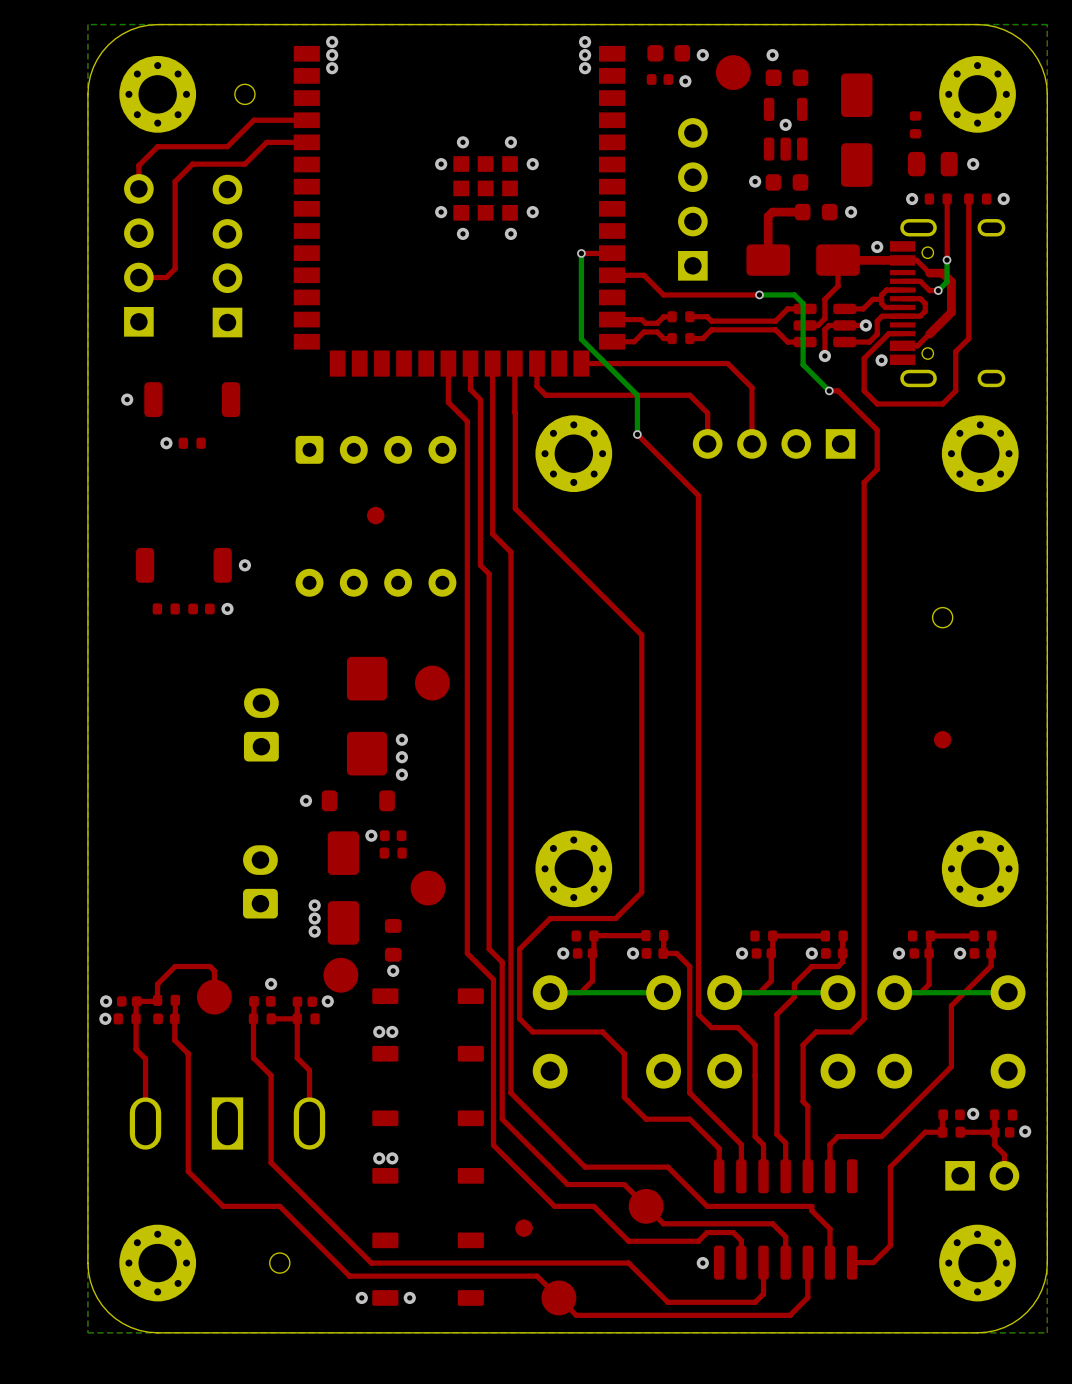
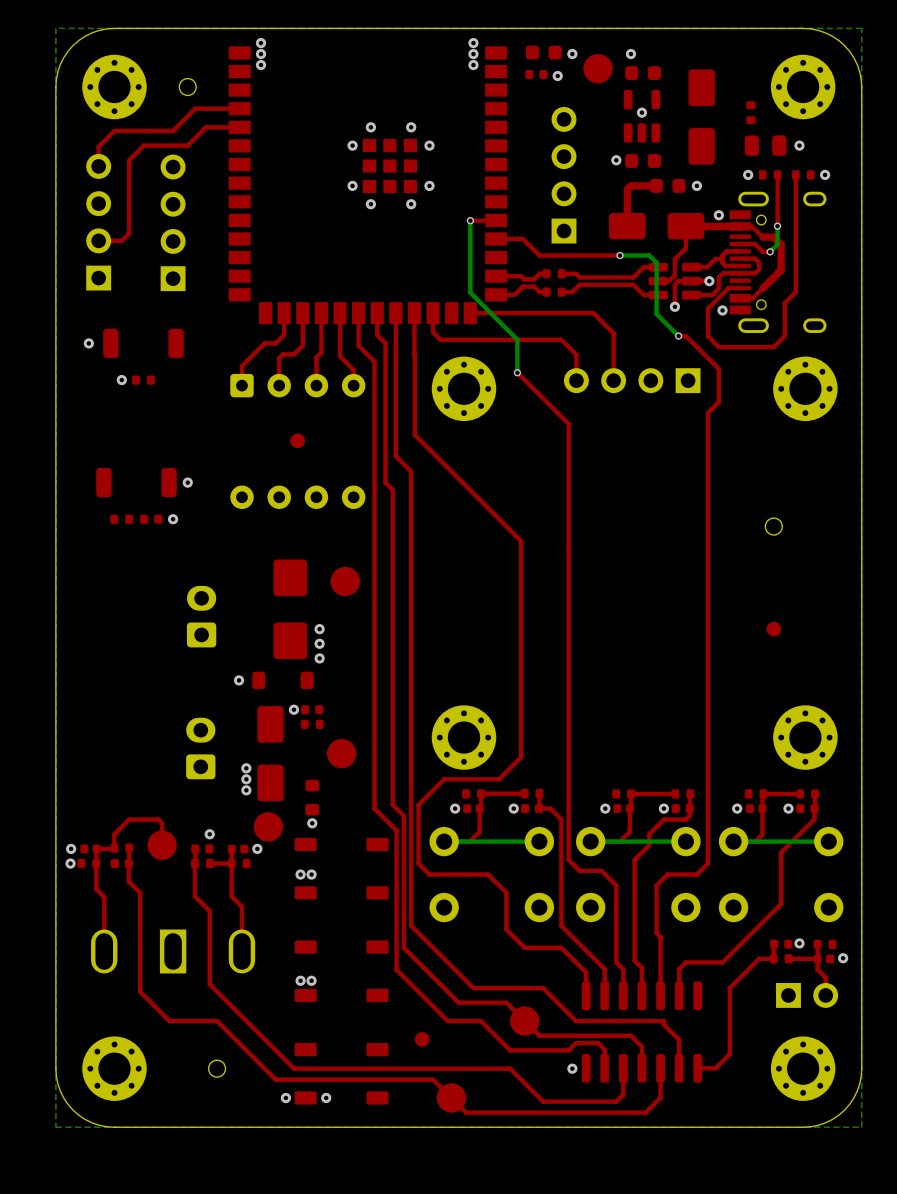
top track: none -> (284, 313) (284, 334) (275, 343) (264, 343) (242, 366) (242, 385)
top track: none -> (302, 313) (302, 345) (293, 354) (282, 354) (279, 358) (279, 385)
top track: none -> (321, 313) (321, 352) (316, 357) (316, 385)
top track: none -> (340, 313) (340, 356) (353, 370) (353, 385)

